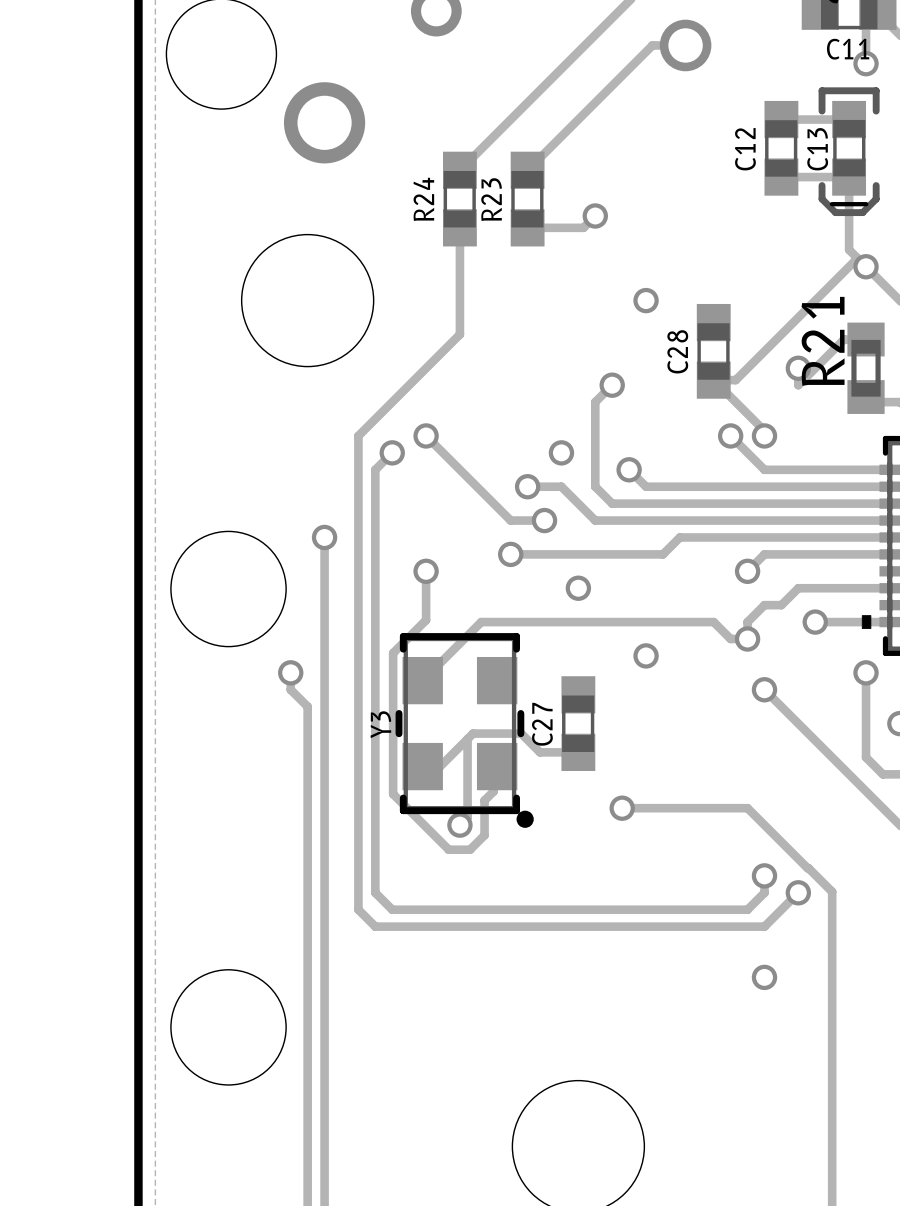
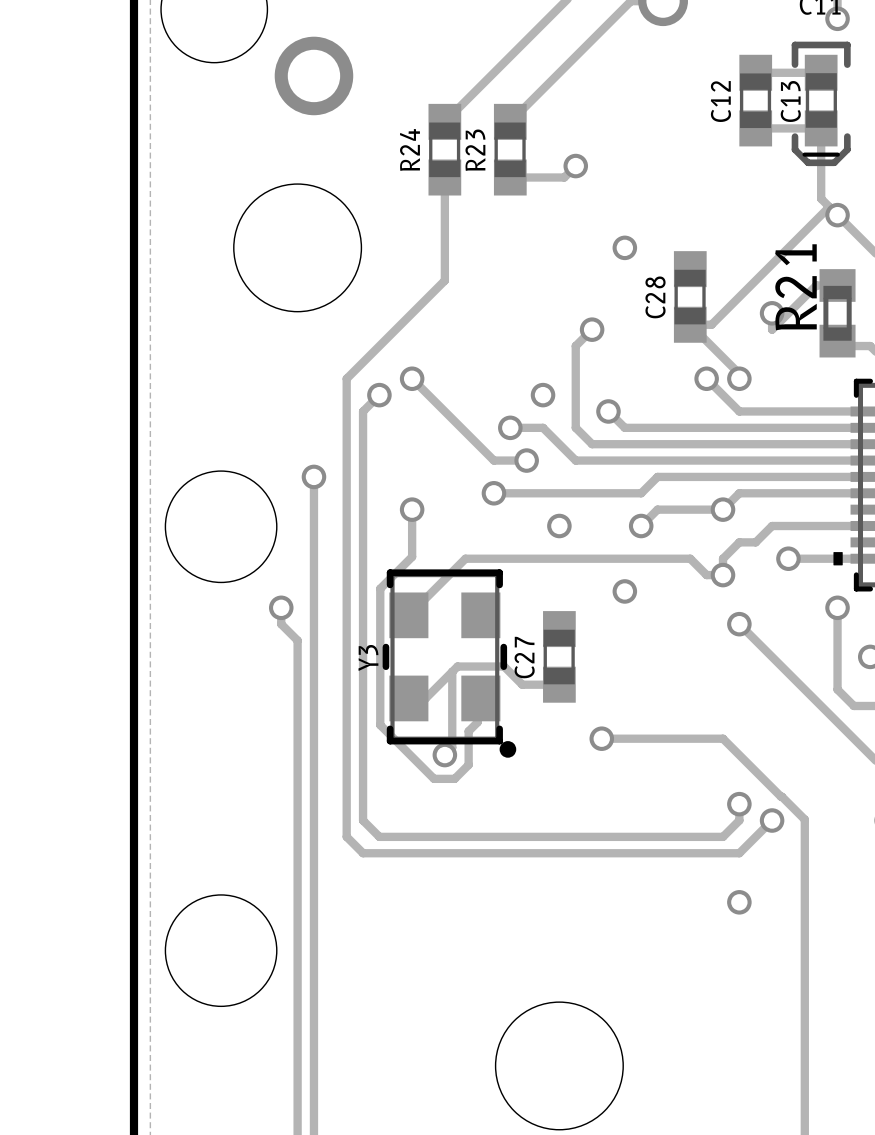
track: none -> (723, 509) (657, 509) (641, 526)
via: none -> (641, 526)

